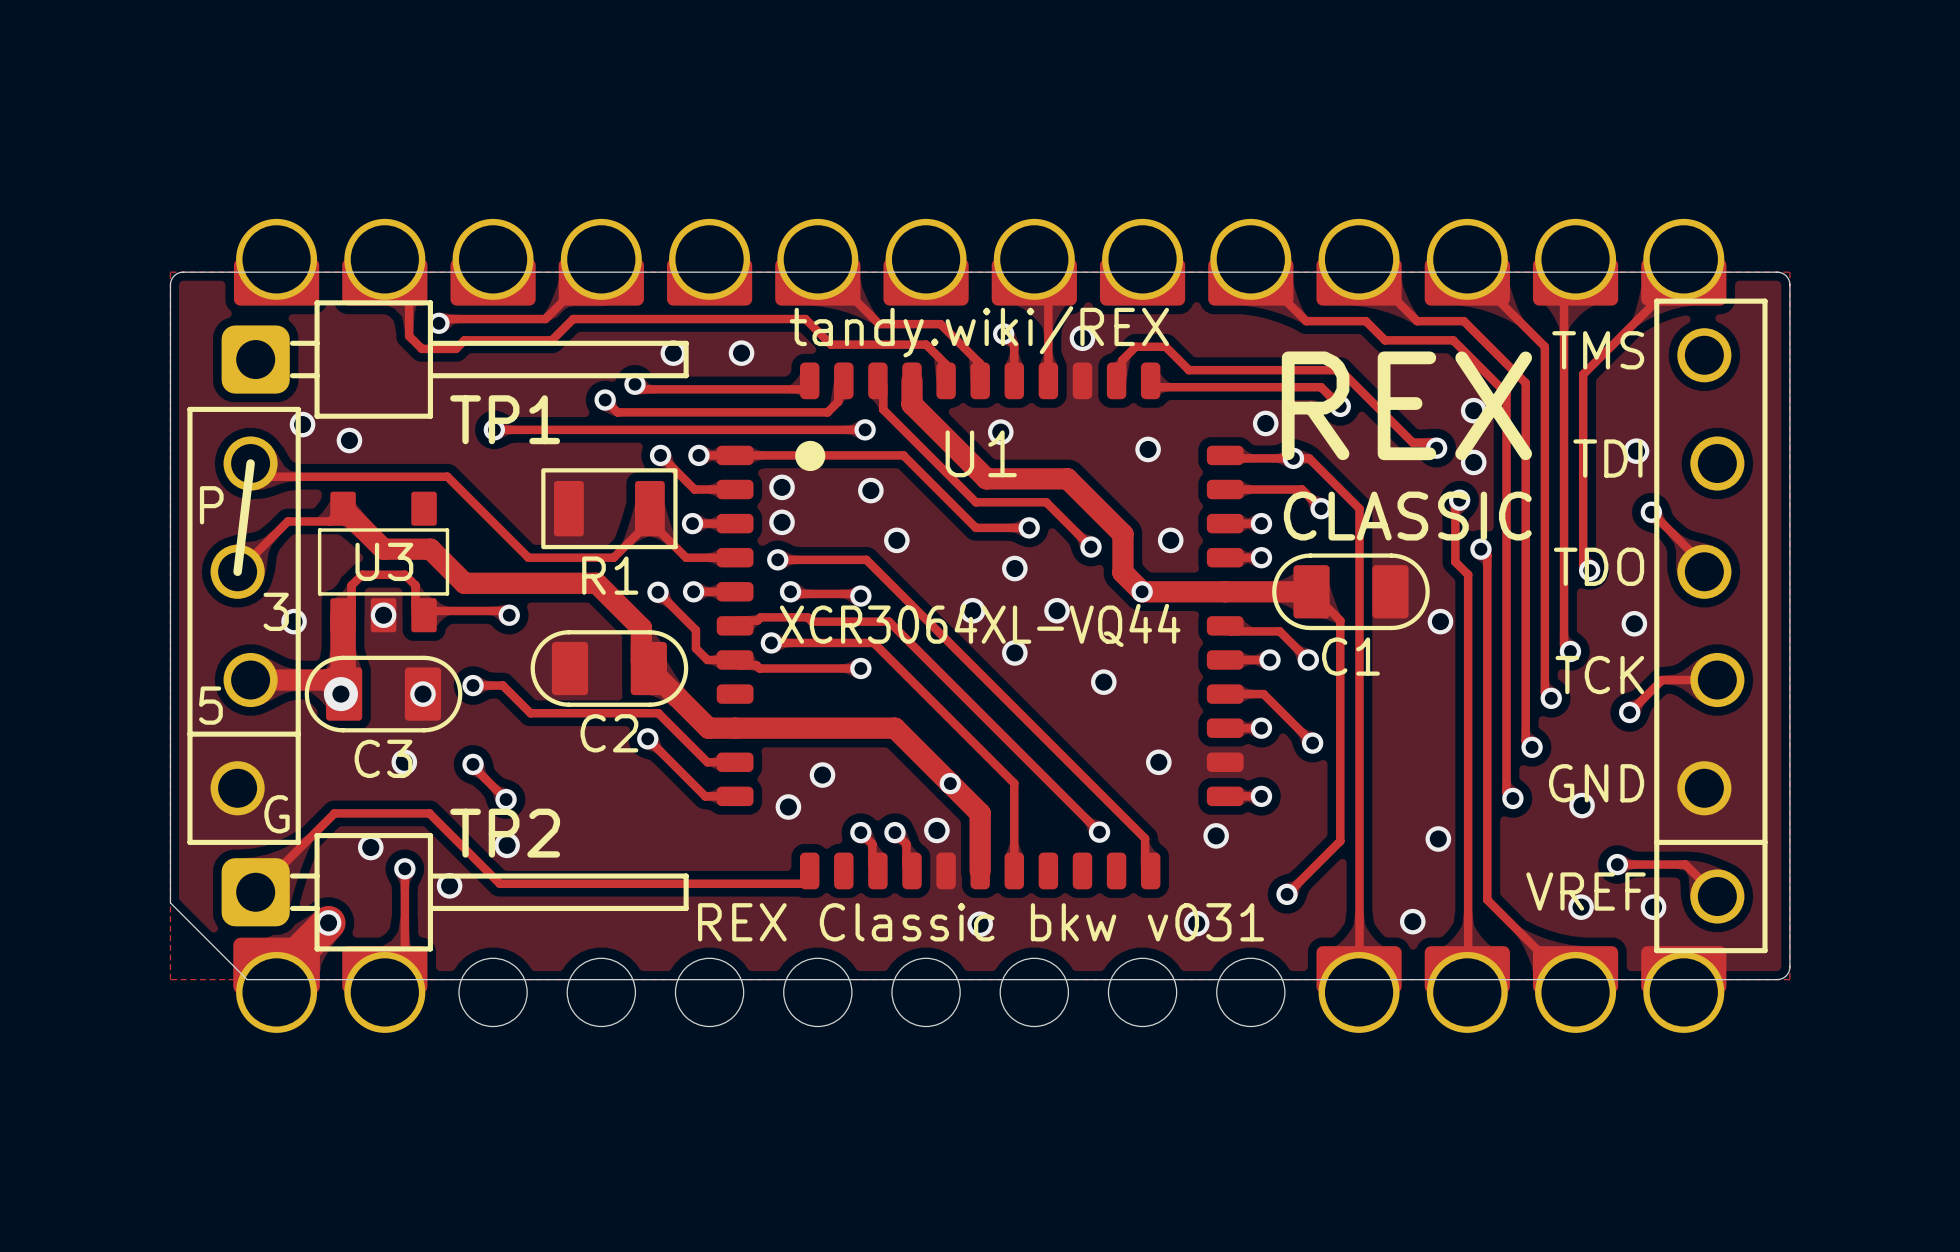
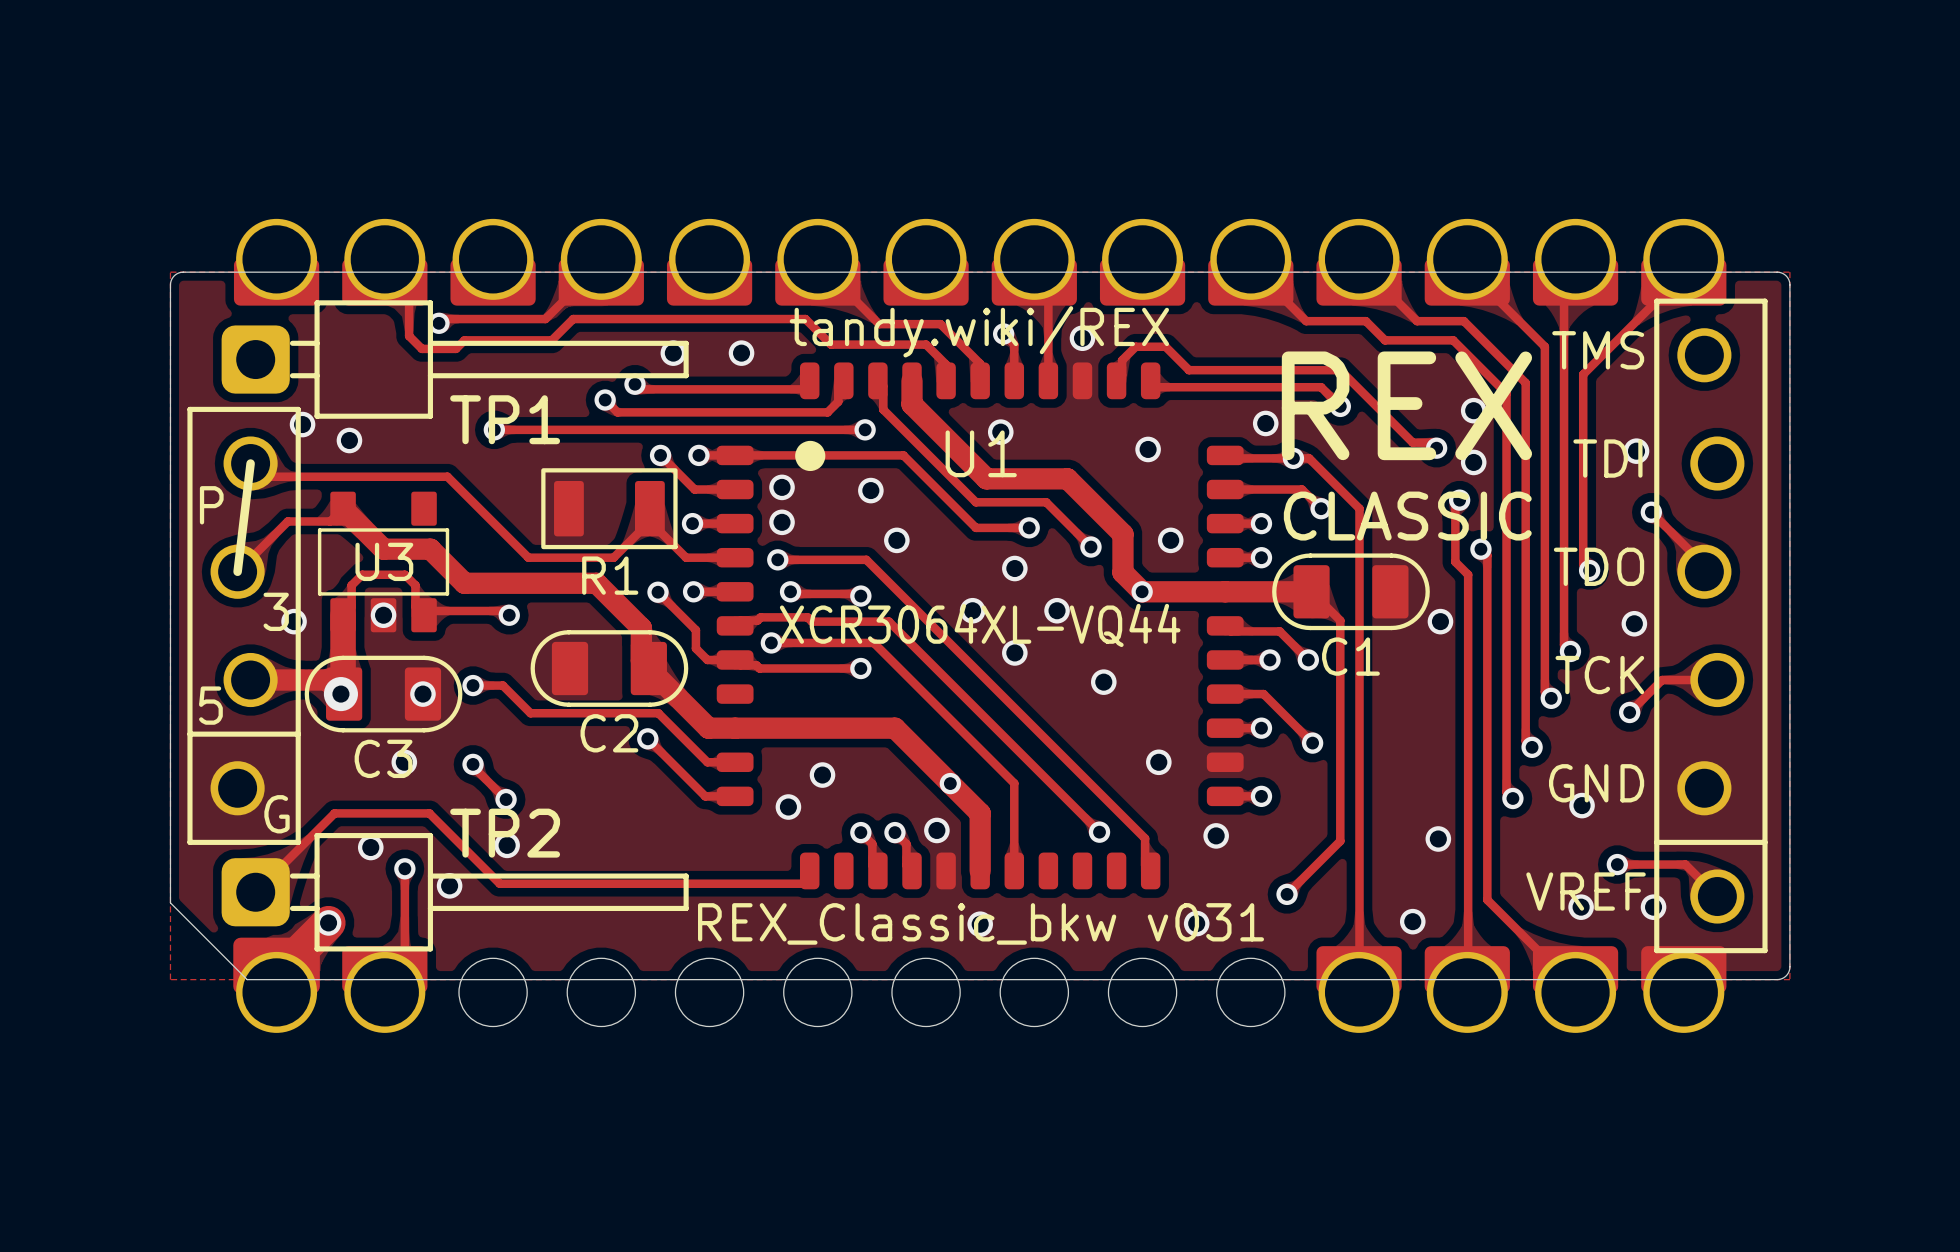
text: REX Classic bkw v031 (981, 922) -> REX_Classic_bkw v031 (981, 923)

